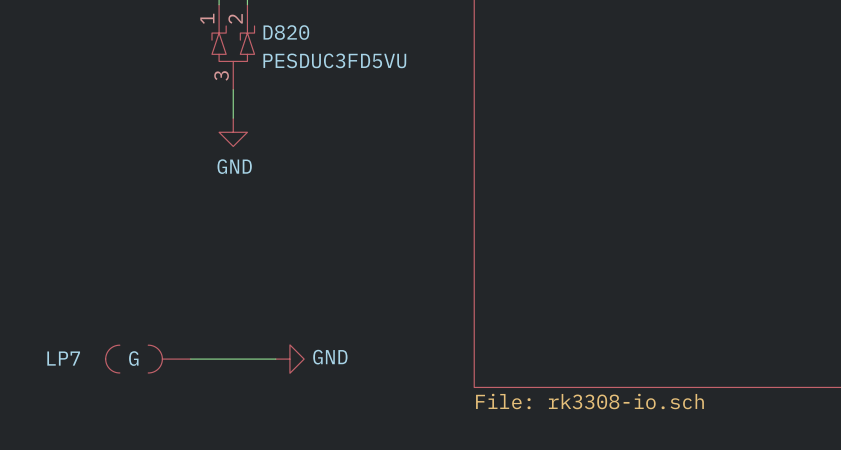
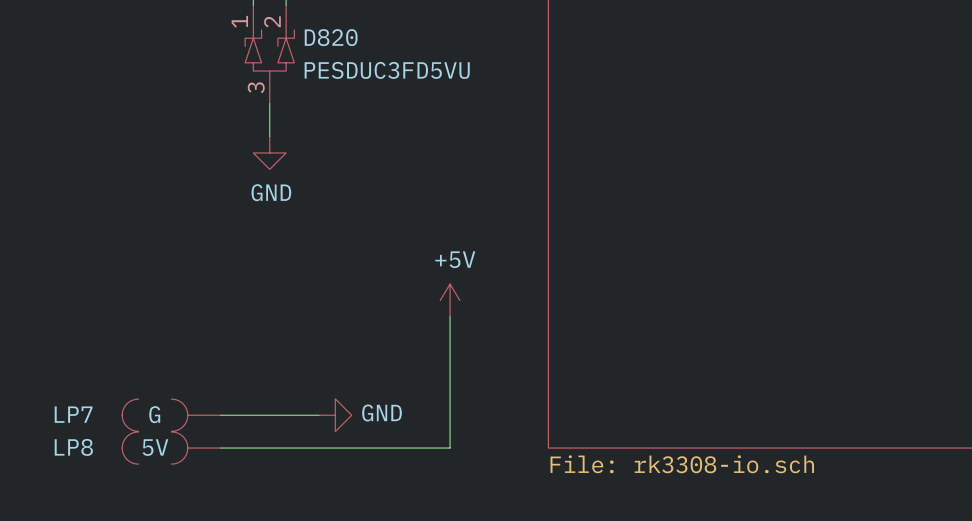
power symbol: none -> +5V (450, 300)
wire: none -> (450, 316) (450, 448) (220, 448)
LP8: none -> 5V (171, 448)

